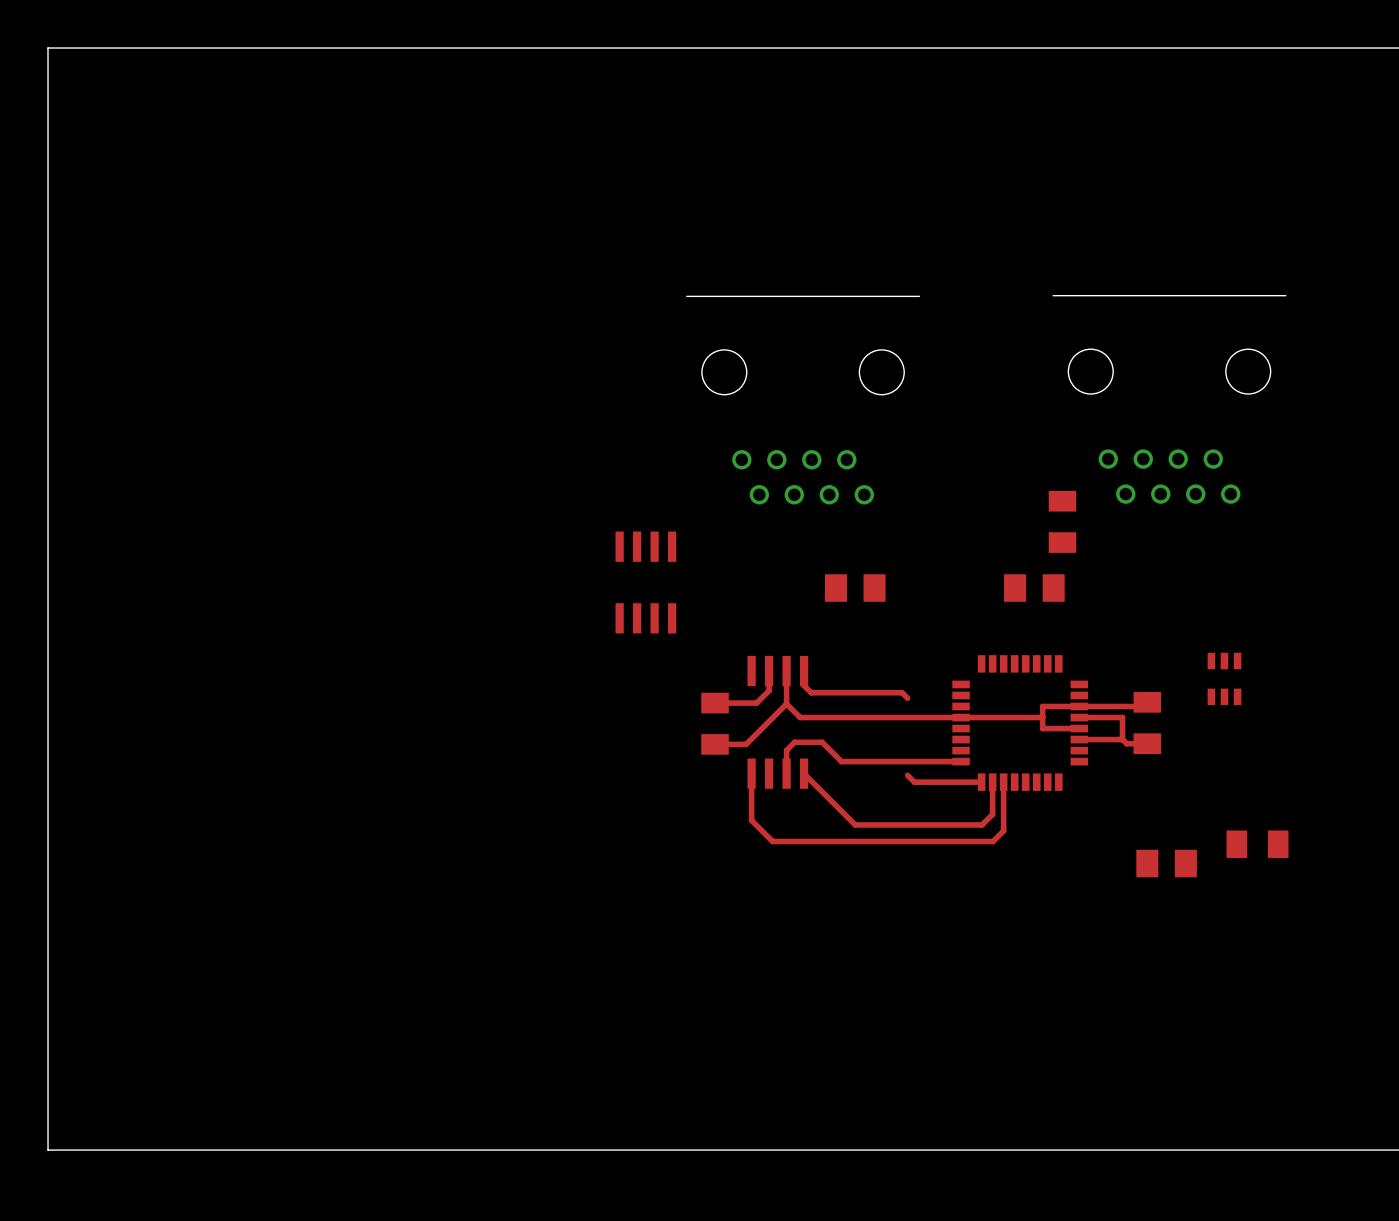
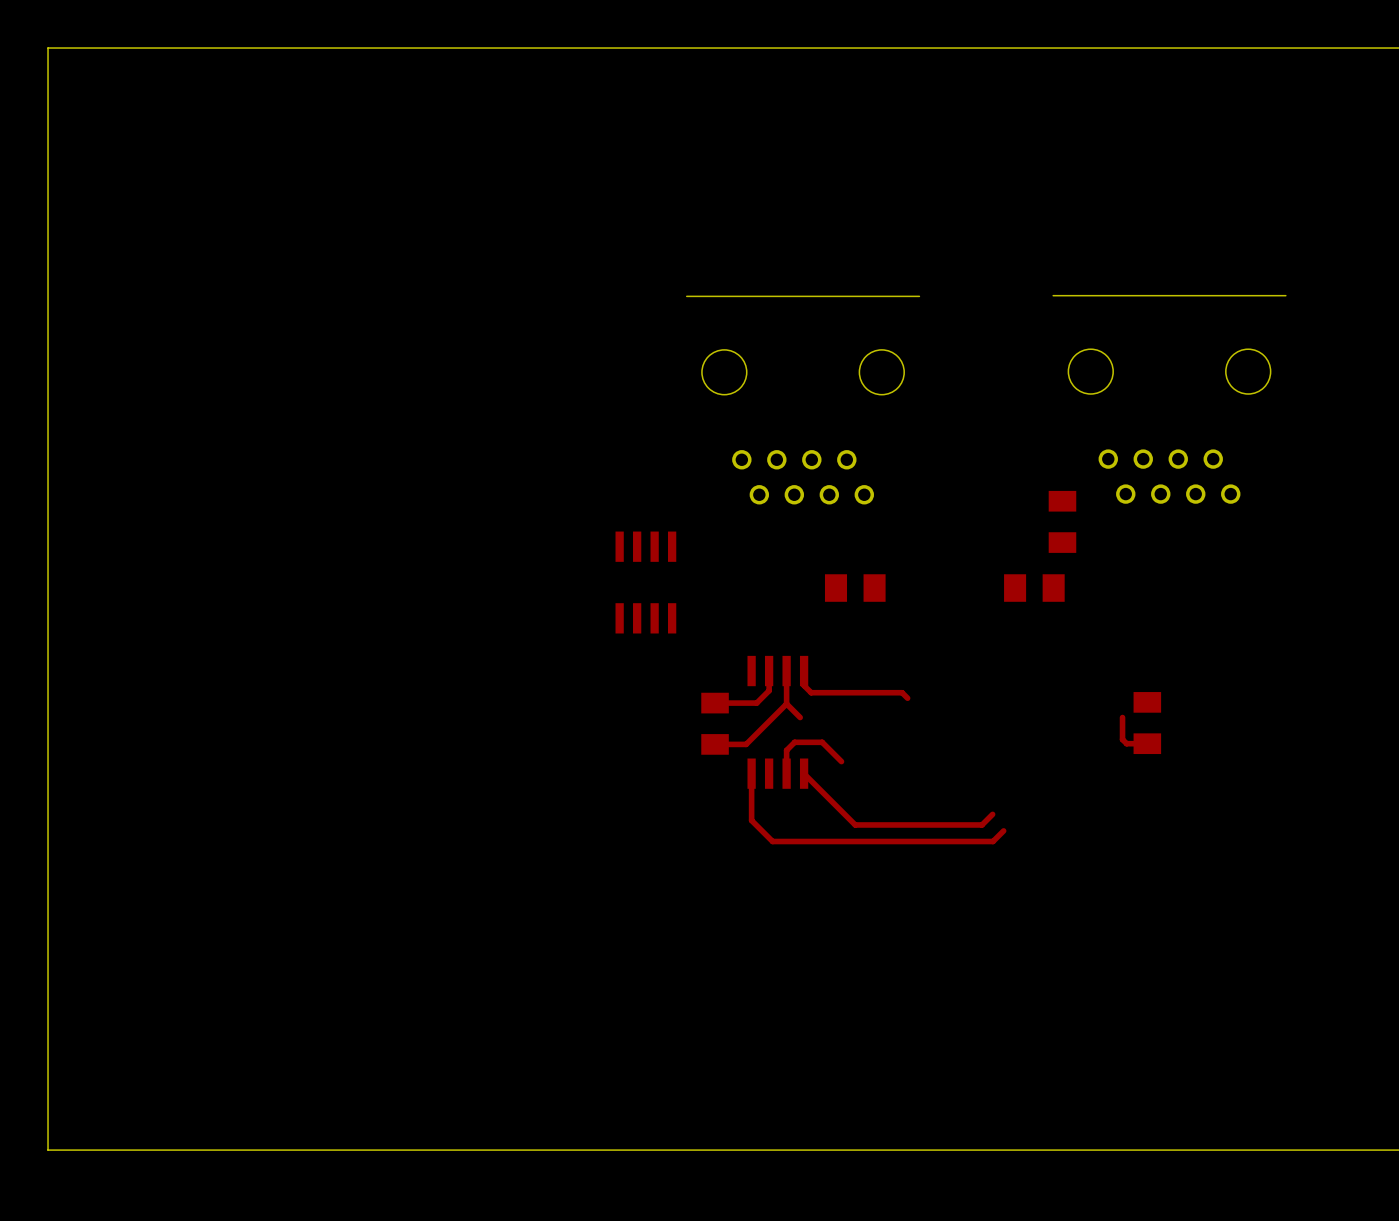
part: (1224, 678) -> none
top track: (1143, 706) (1042, 706) (1042, 728) (1079, 728) -> none
top track: (1042, 717) (800, 717) -> none
top track: (1122, 717) (1079, 717) -> none
part: (1020, 723) -> none
top track: (1122, 739) (1079, 739) -> none
top track: (961, 761) (841, 761) -> none
top track: (907, 775) (914, 782) (981, 782) -> none
top track: (992, 782) (992, 814) -> none
top track: (1003, 782) (1003, 830) -> none
part: (1257, 844) -> none
part: (1166, 863) -> none

